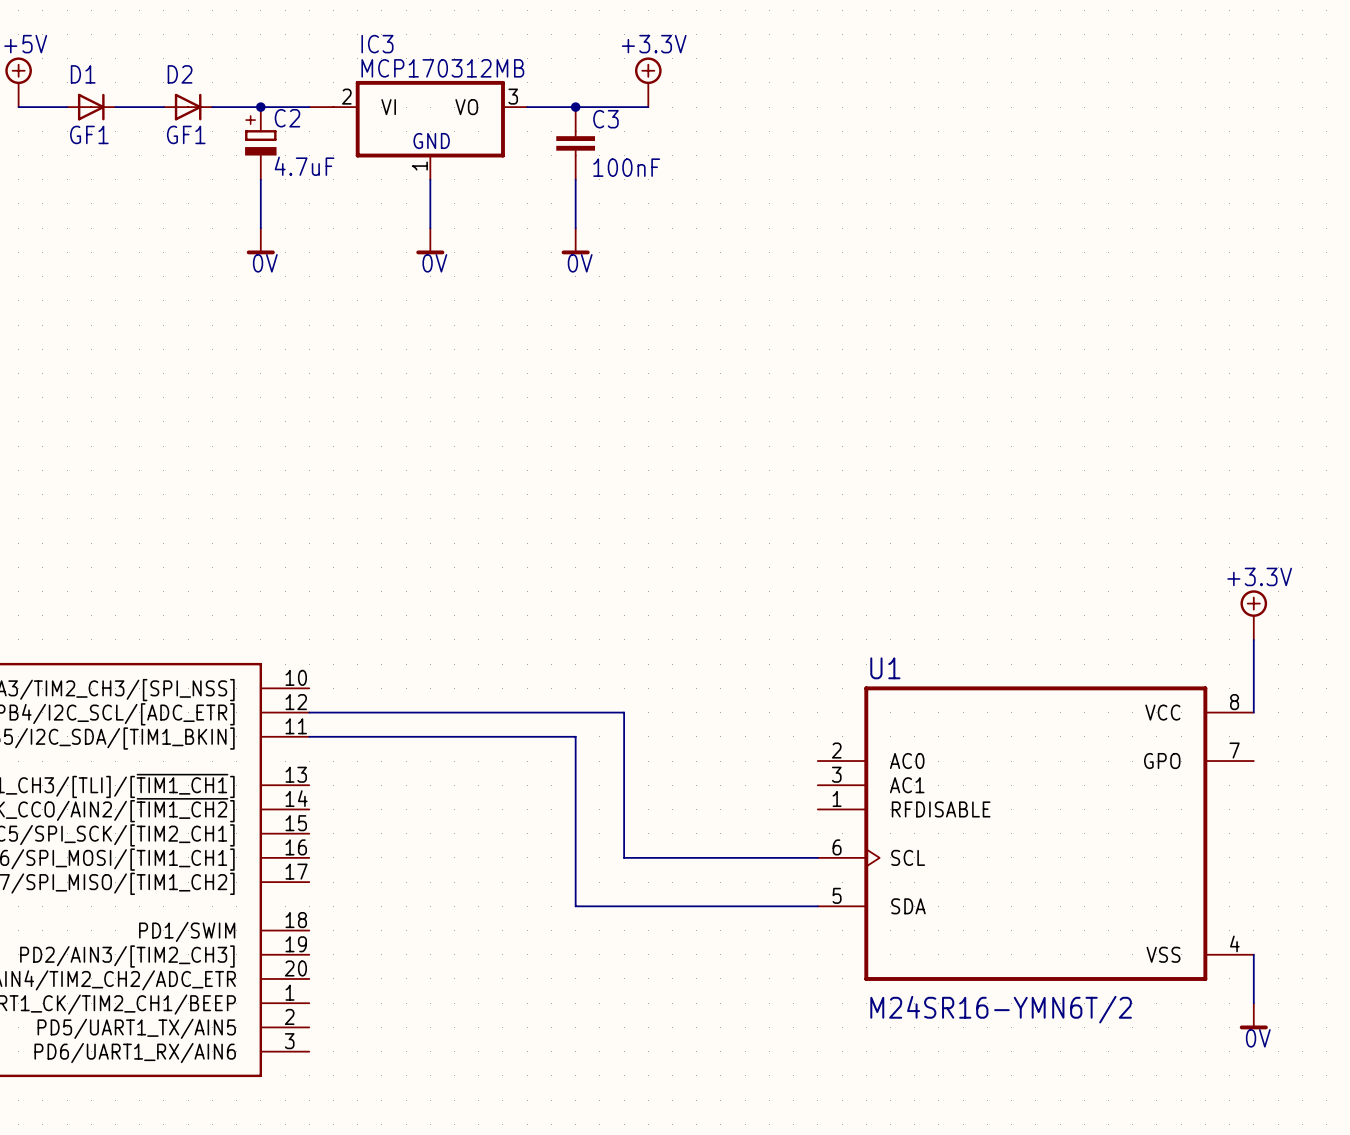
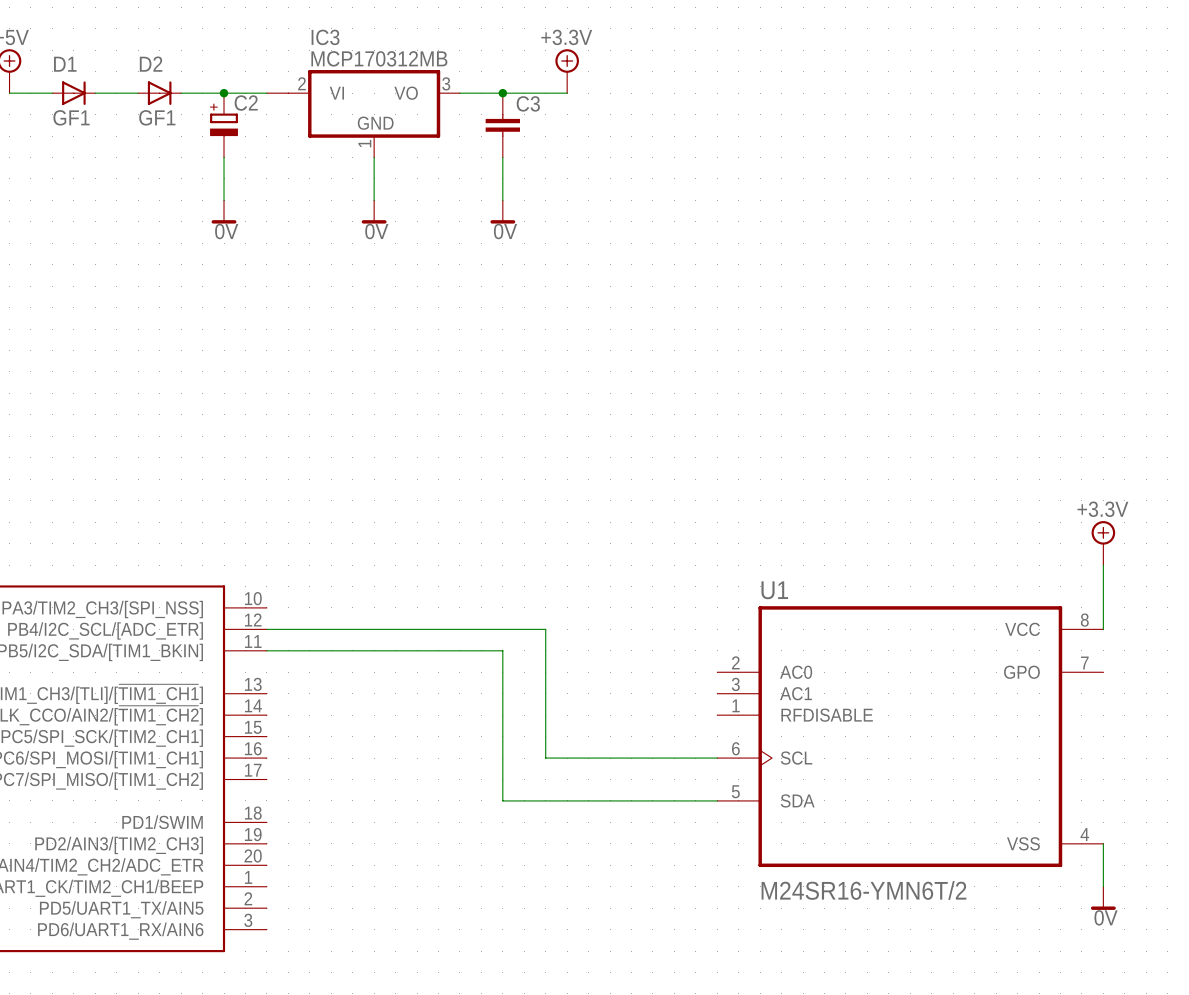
C2 value: 4.7uF (304, 166) -> none
C3 value: 100nF (626, 167) -> none

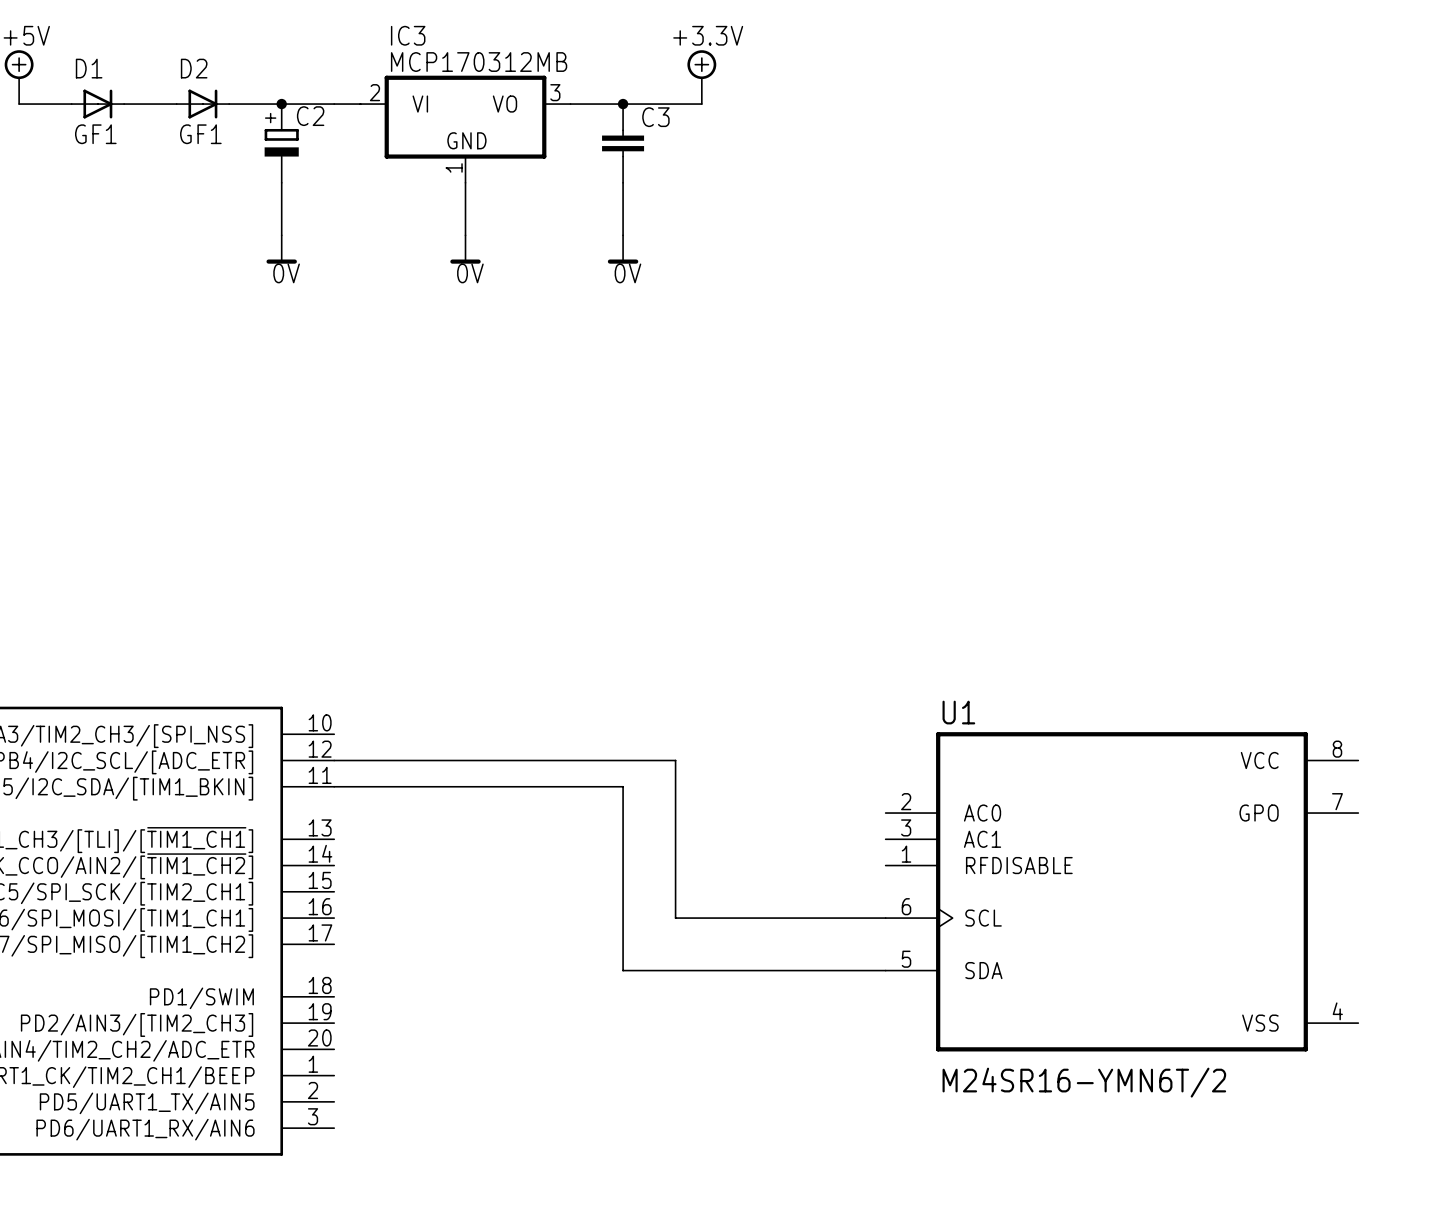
power symbol: +3.3V (1103, 543) -> none
wire: (1103, 565) (1103, 629) -> none
wire: (1103, 843) (1103, 886) -> none
power symbol: 0V (1103, 898) -> none

